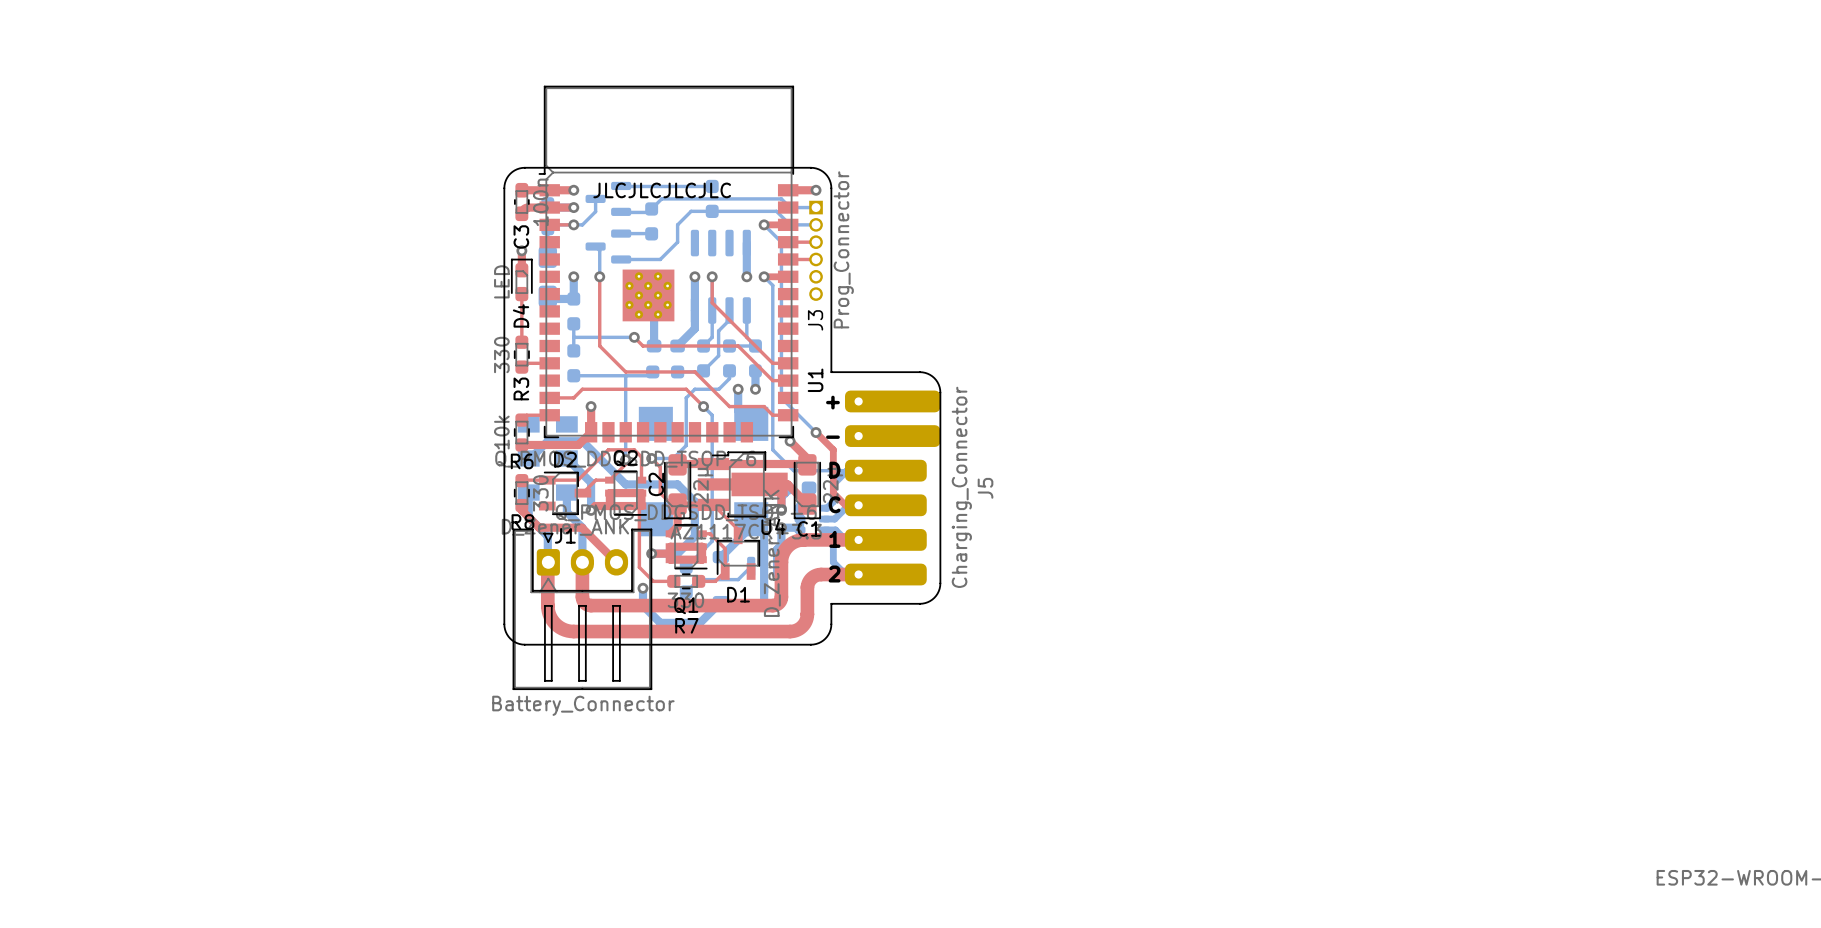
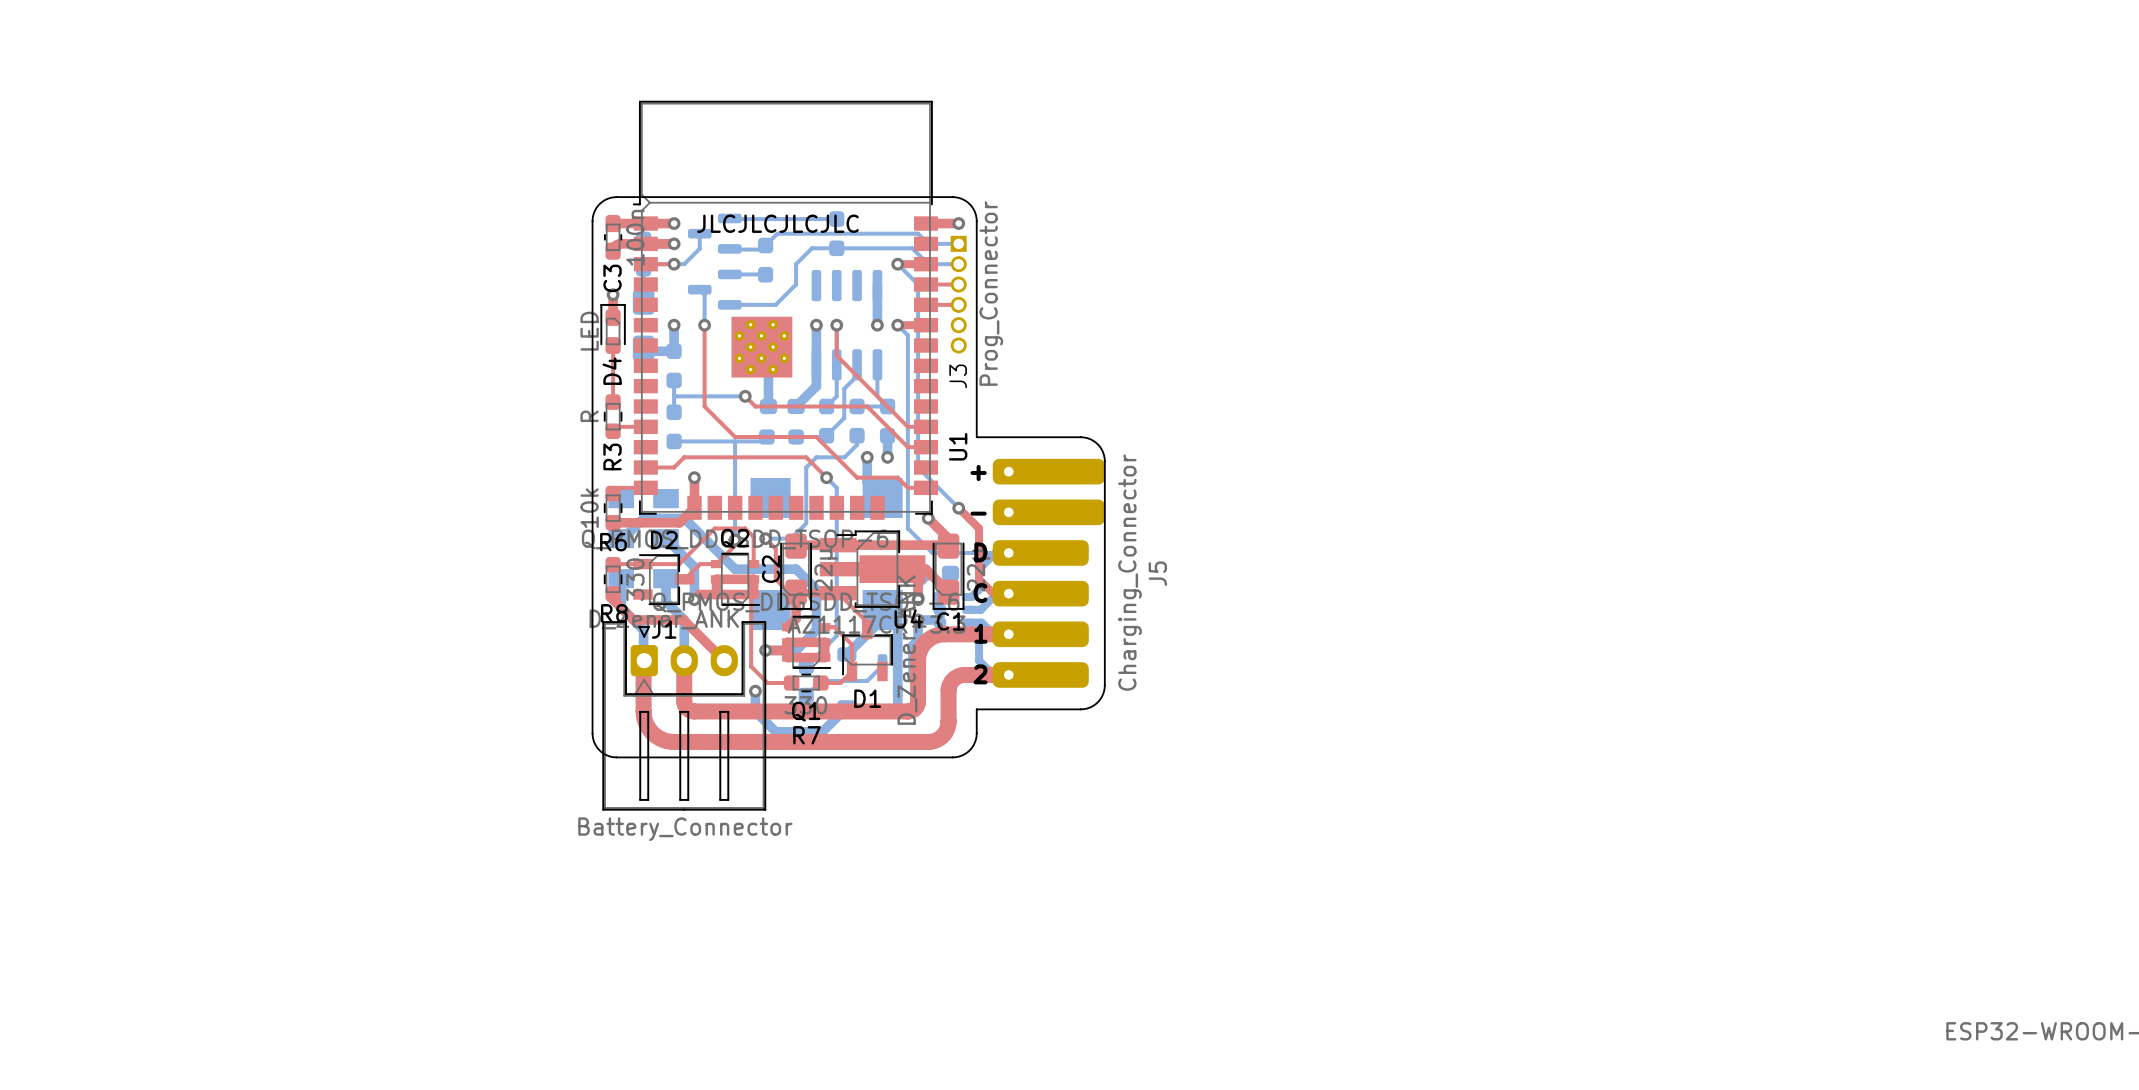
R3 value: 330 (501, 354) -> R (589, 416)

